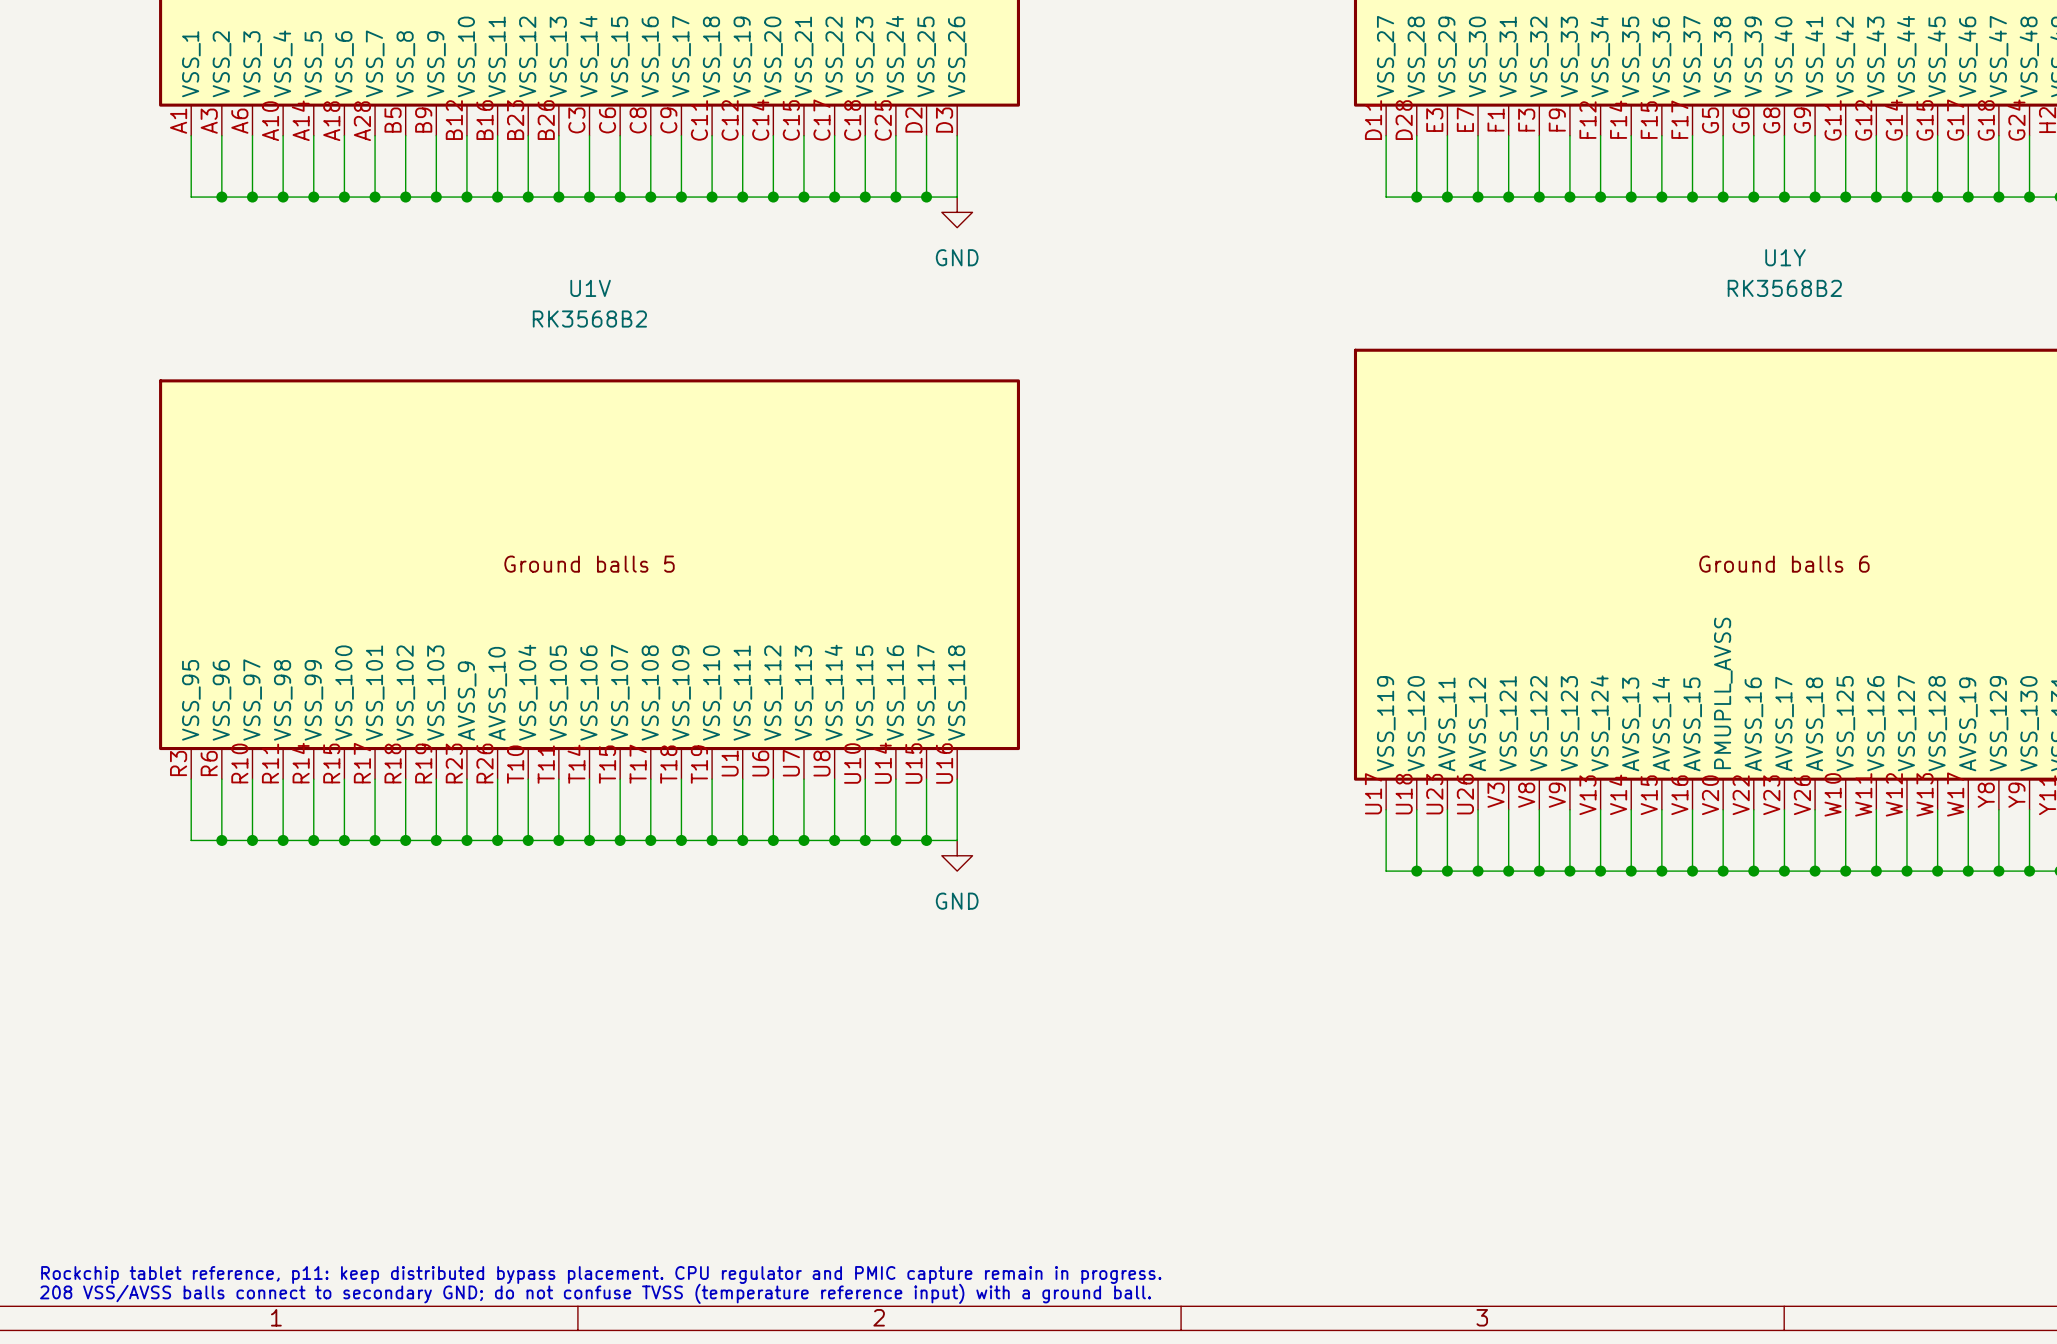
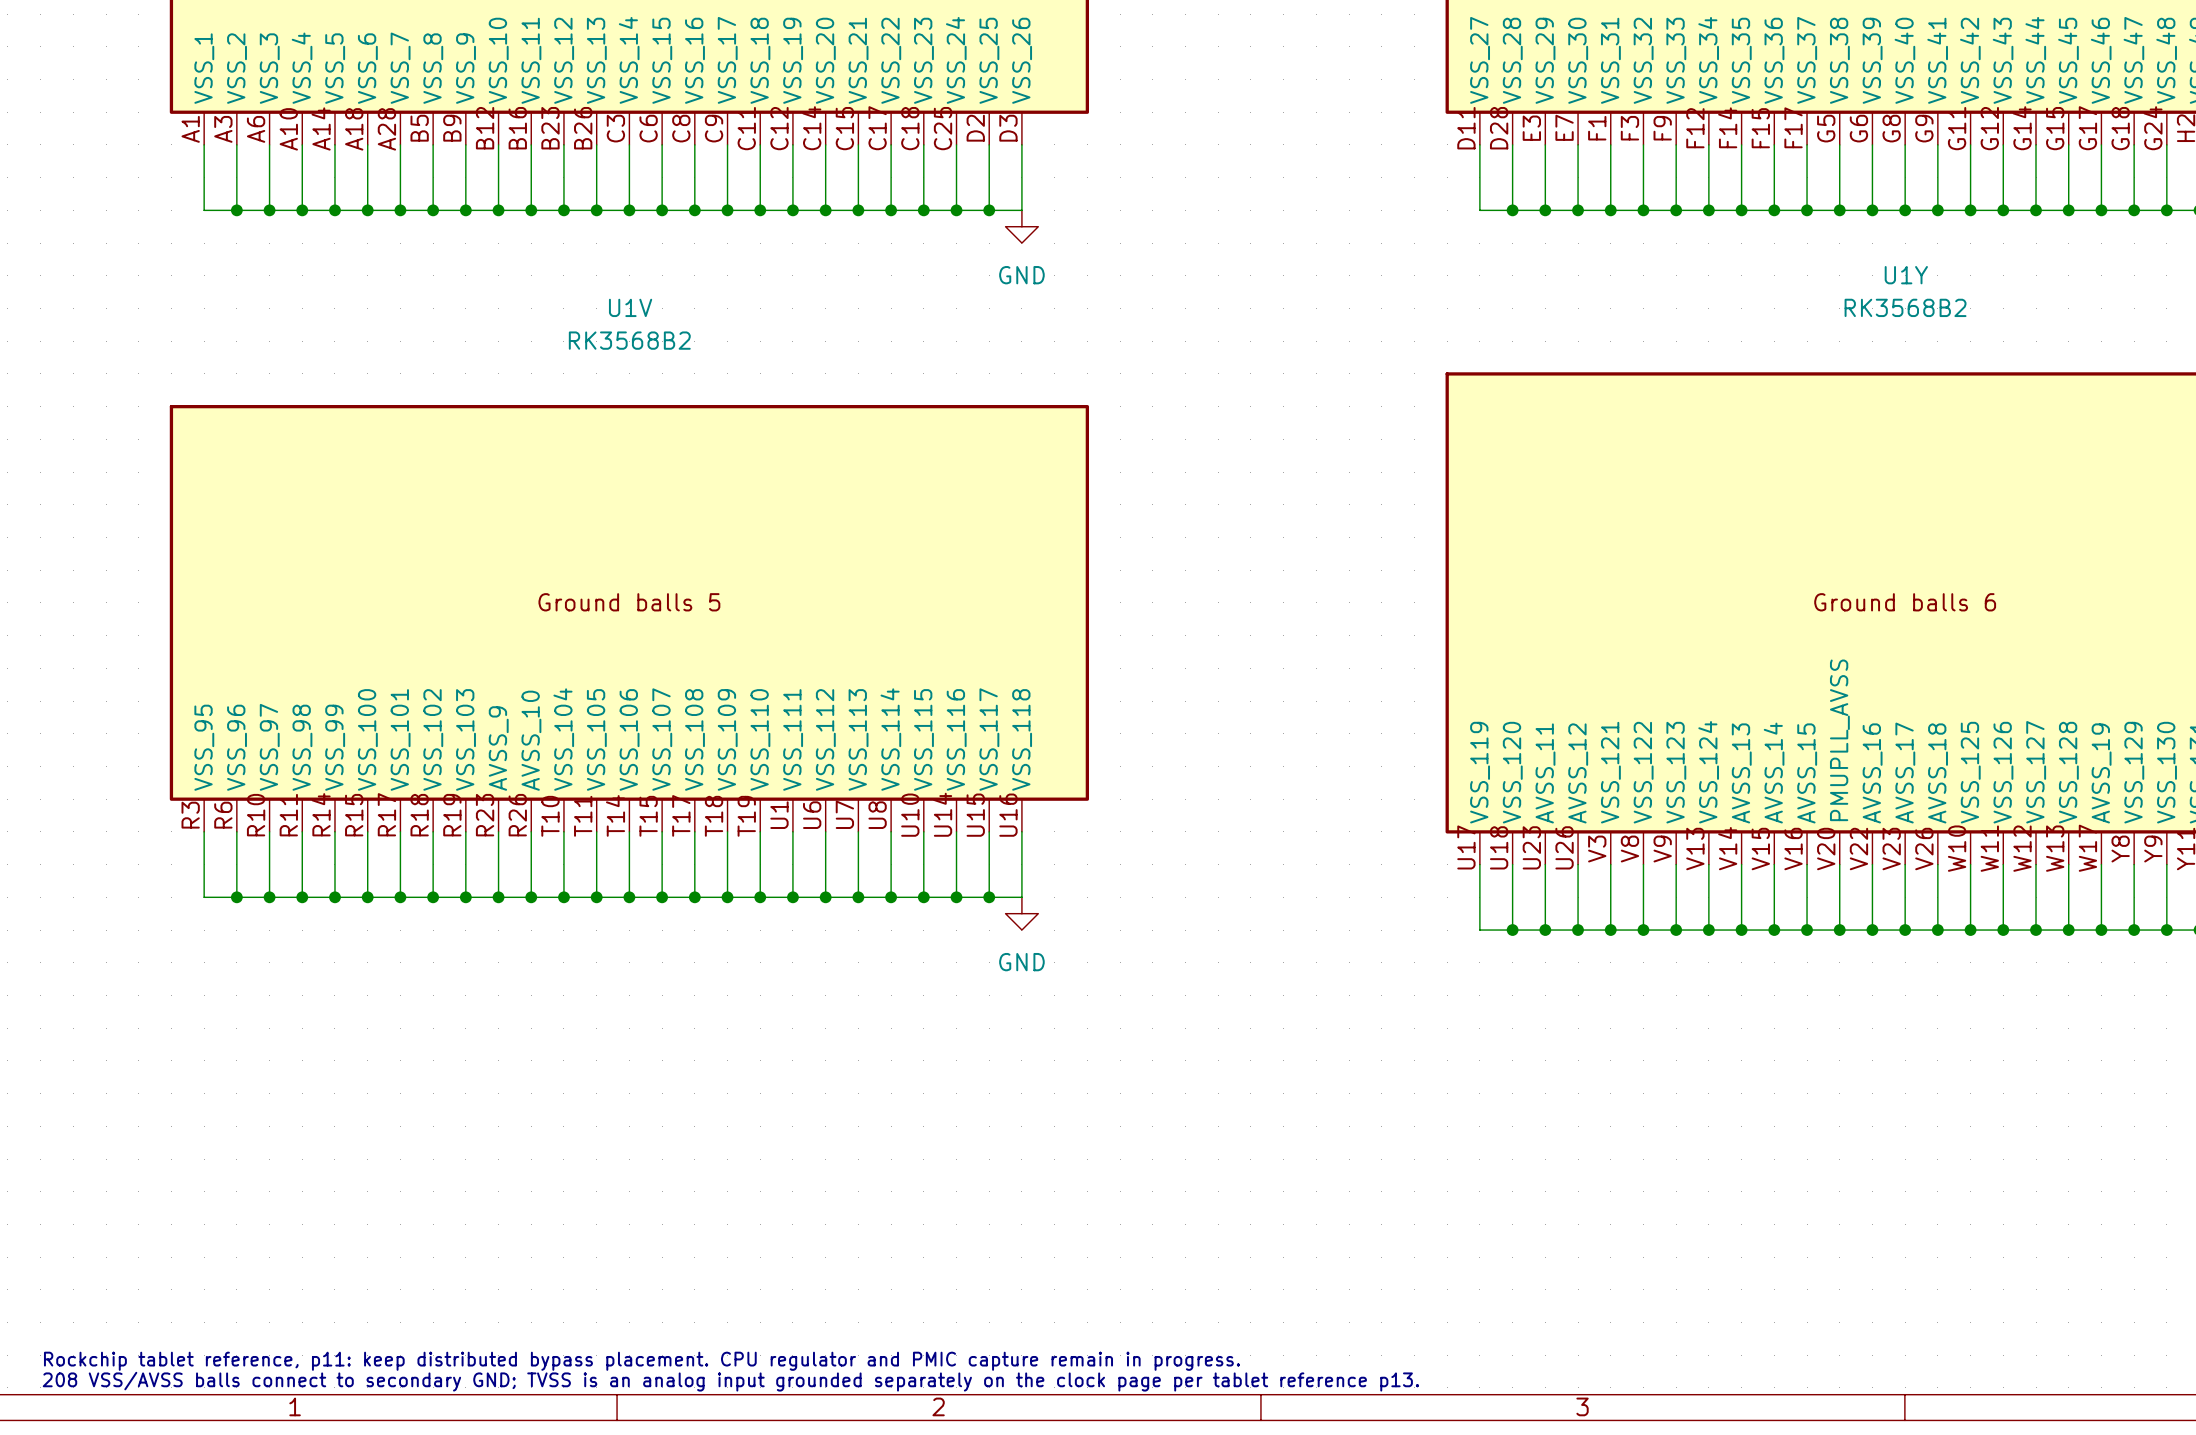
text: 208 VSS/AVSS balls connect to secondary GND; do not confuse TVSS (temperature reference input) with a ground ball. (595, 1293) -> 208 VSS/AVSS balls connect to secondary GND; TVSS is an analog input grounded separately on the clock page per tablet reference p13. (730, 1381)

